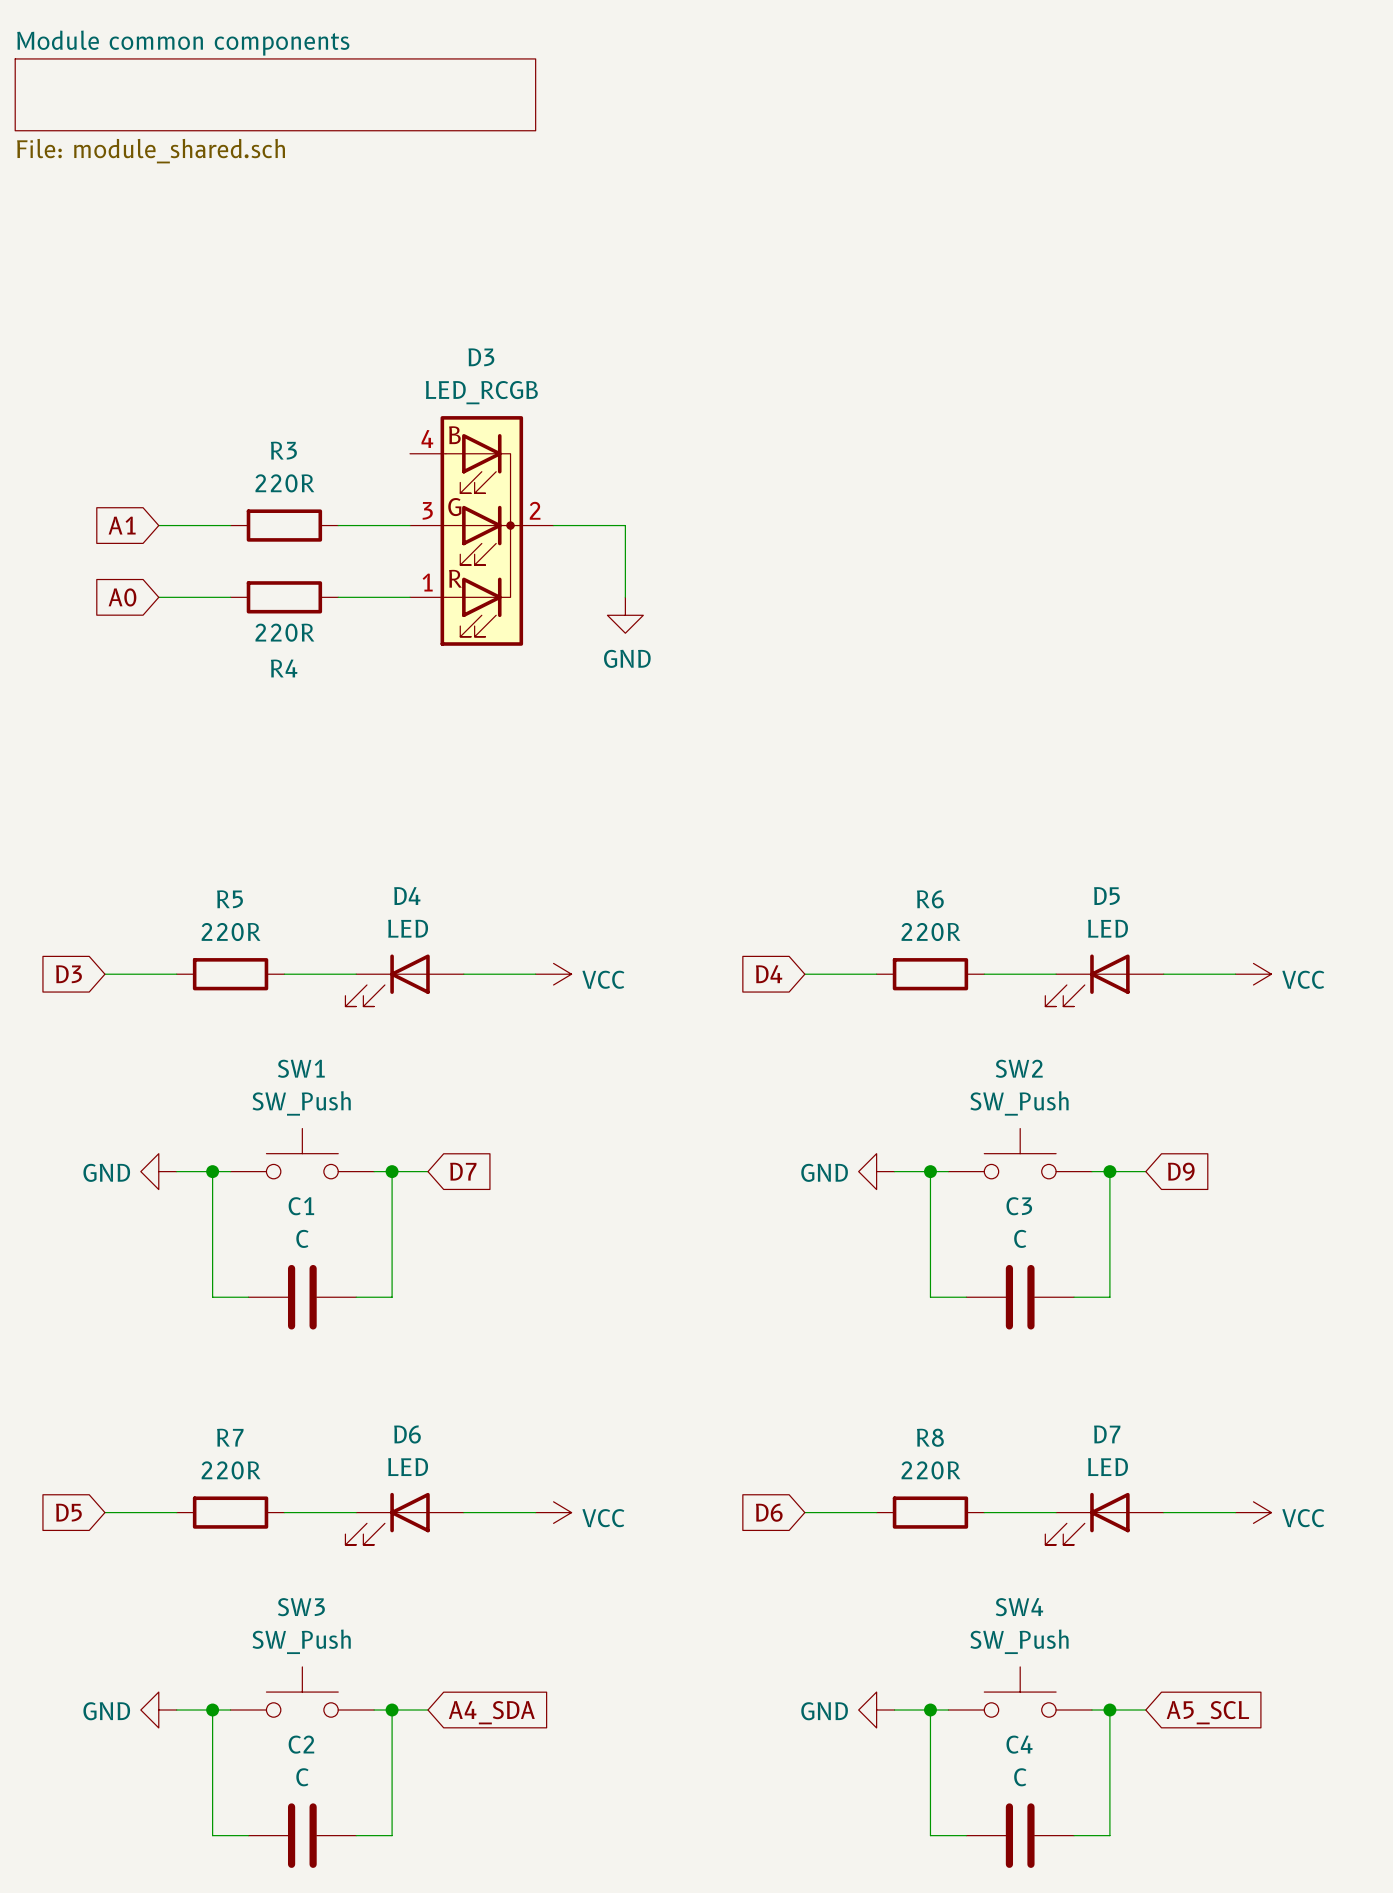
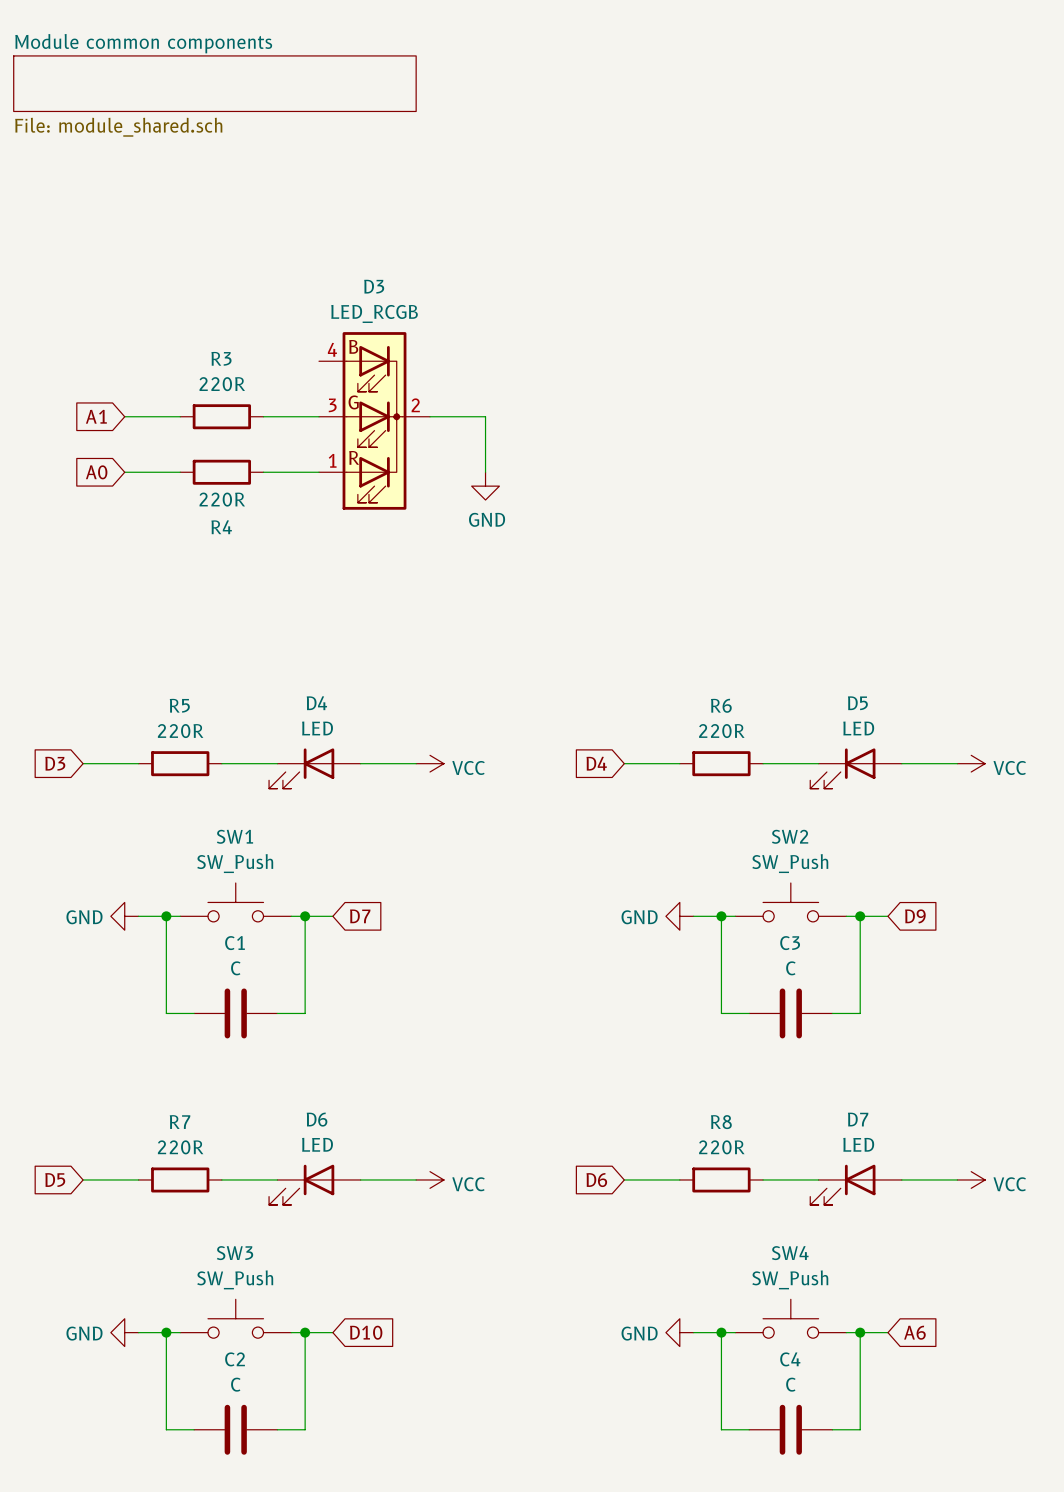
global label: A4_SDA (491, 1712) -> D10 (366, 1332)
global label: A5_SCL (1207, 1712) -> A6 (914, 1332)

